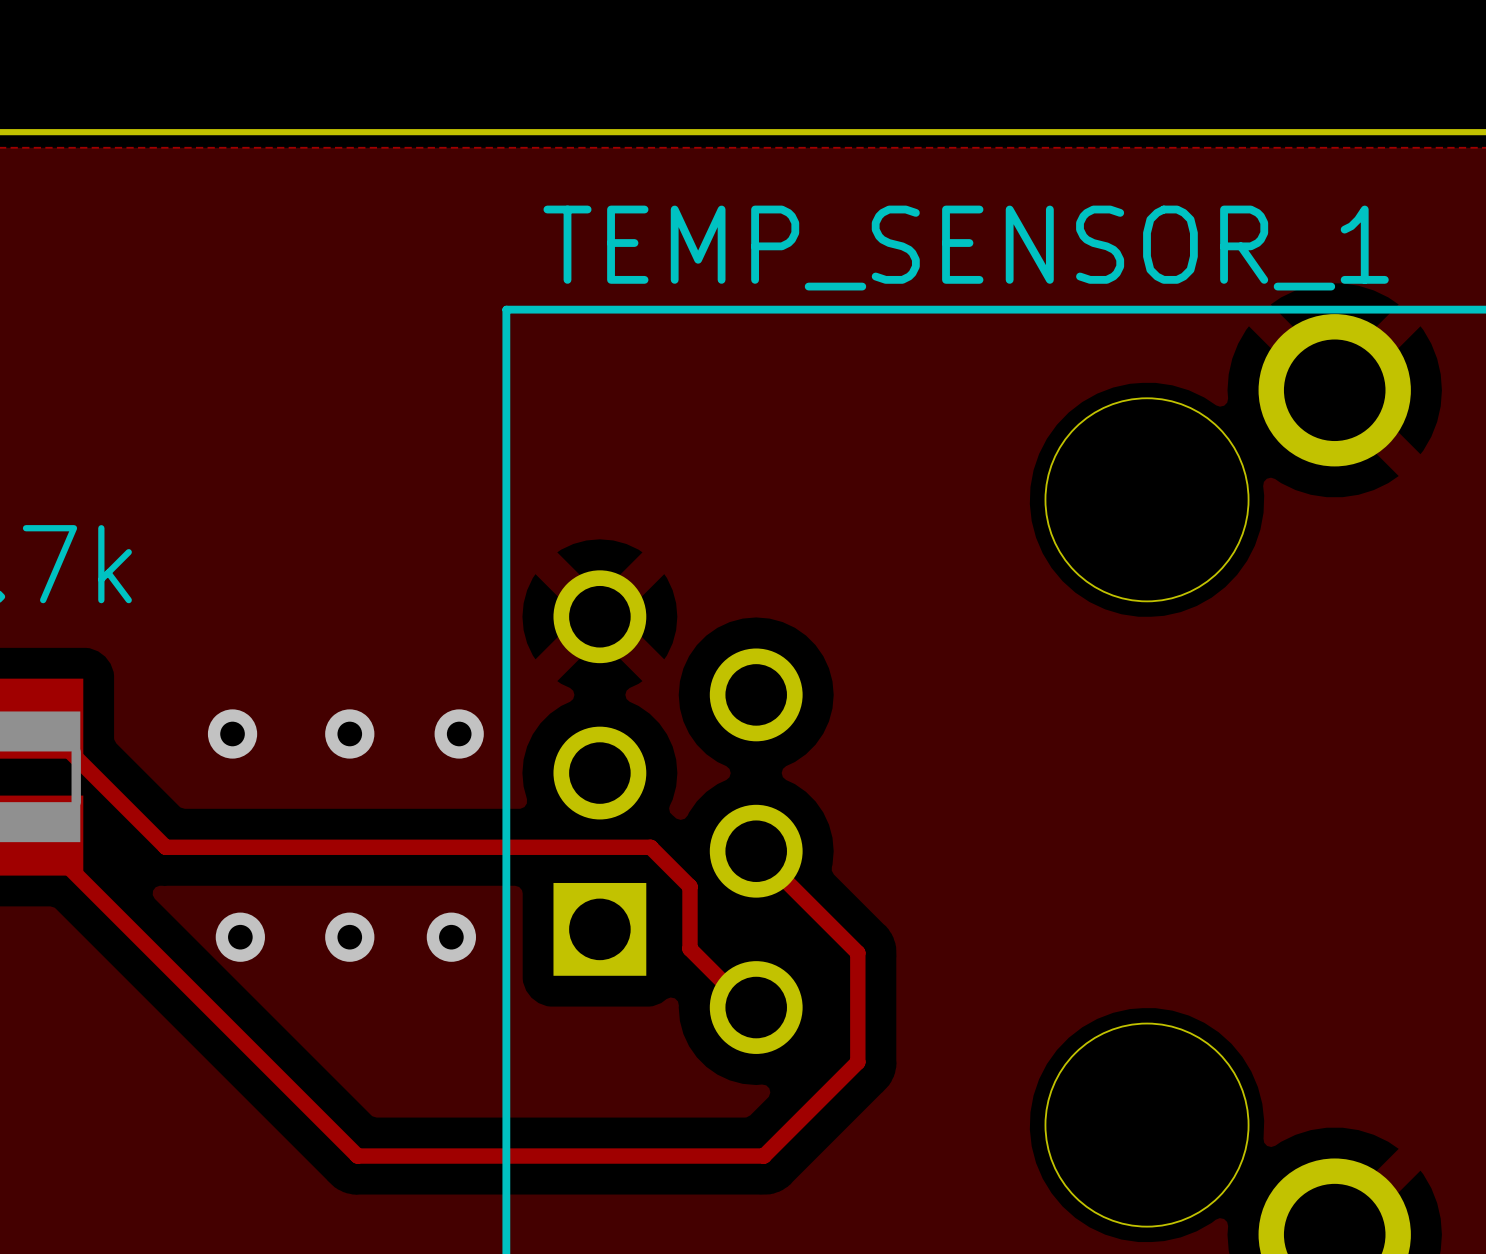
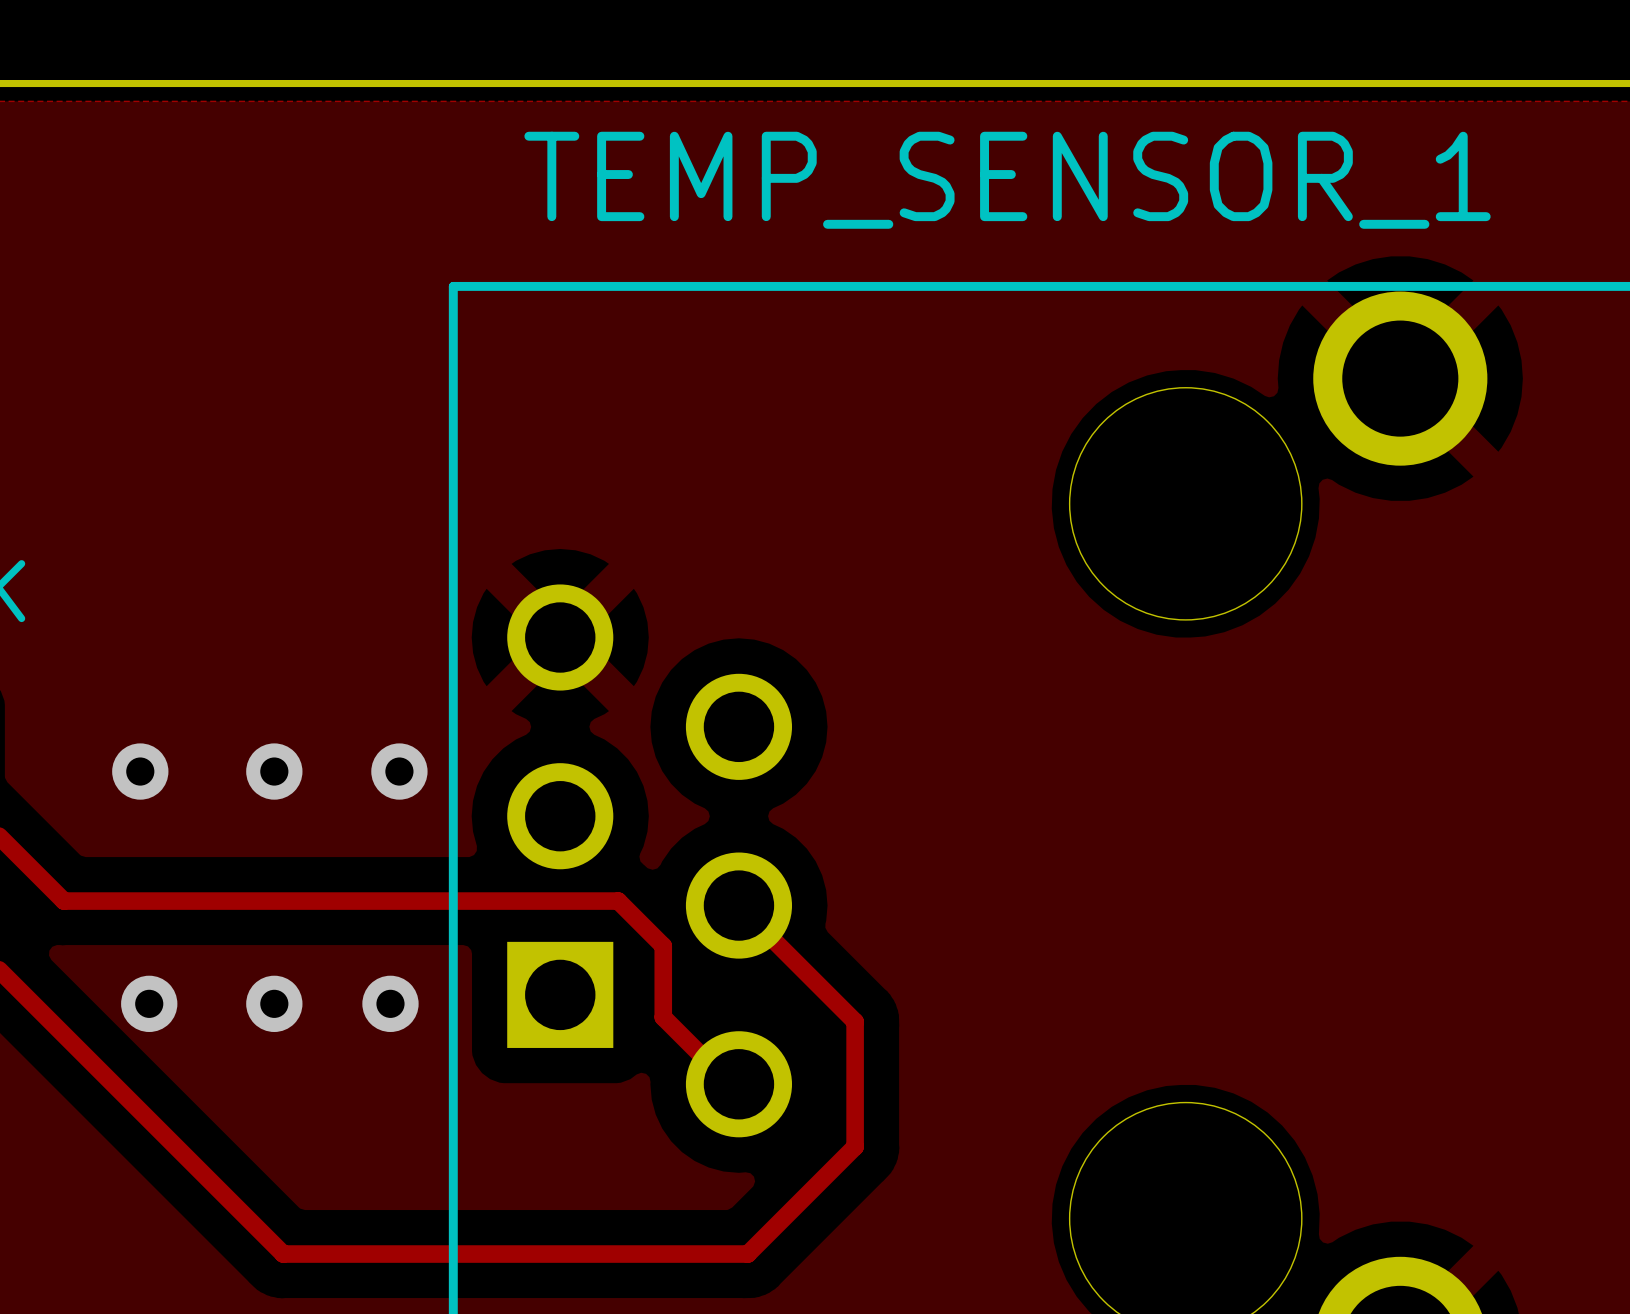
text position: TEMP_SENSOR_1 (966, 248) -> TEMP_SENSOR_1 (1007, 180)

